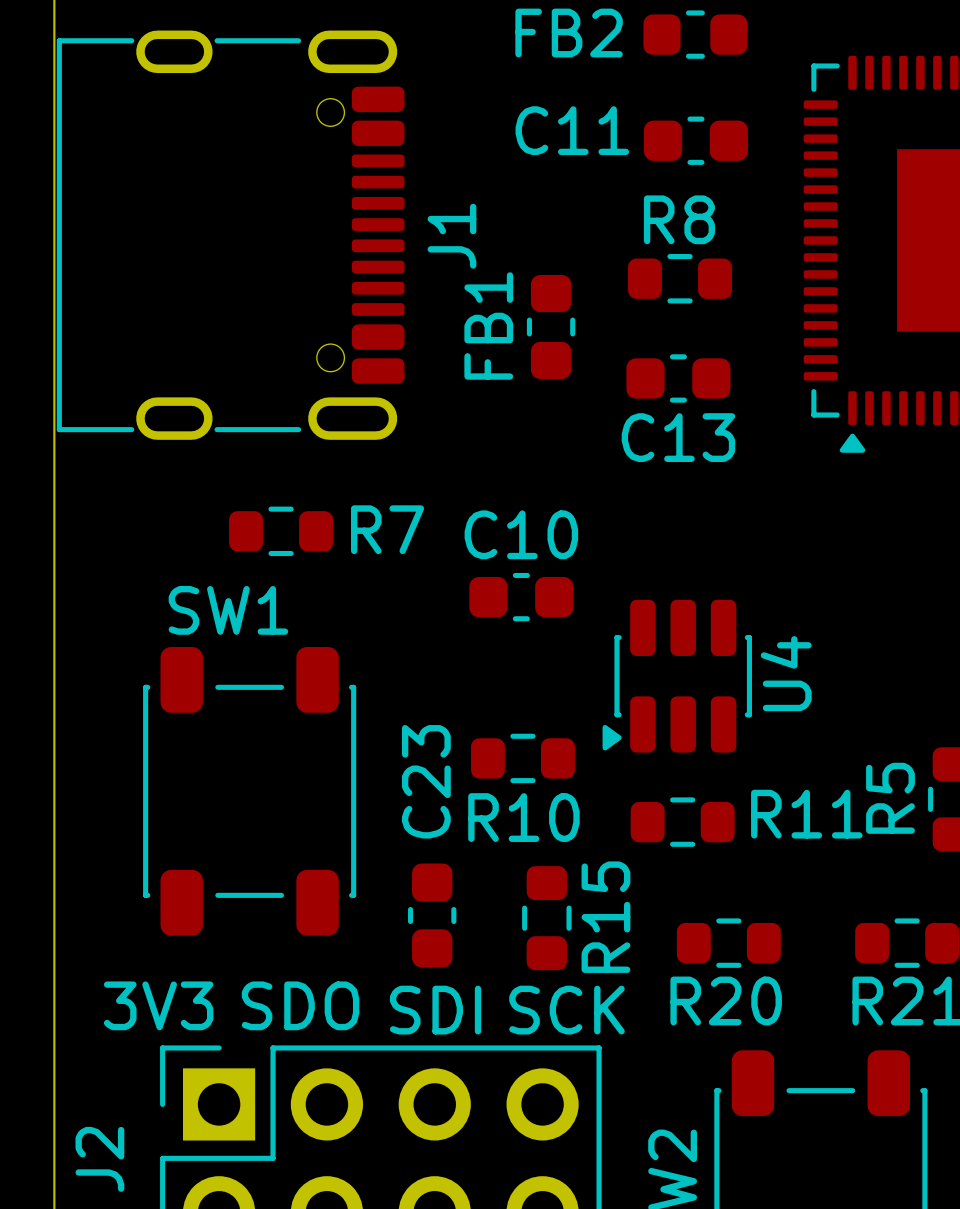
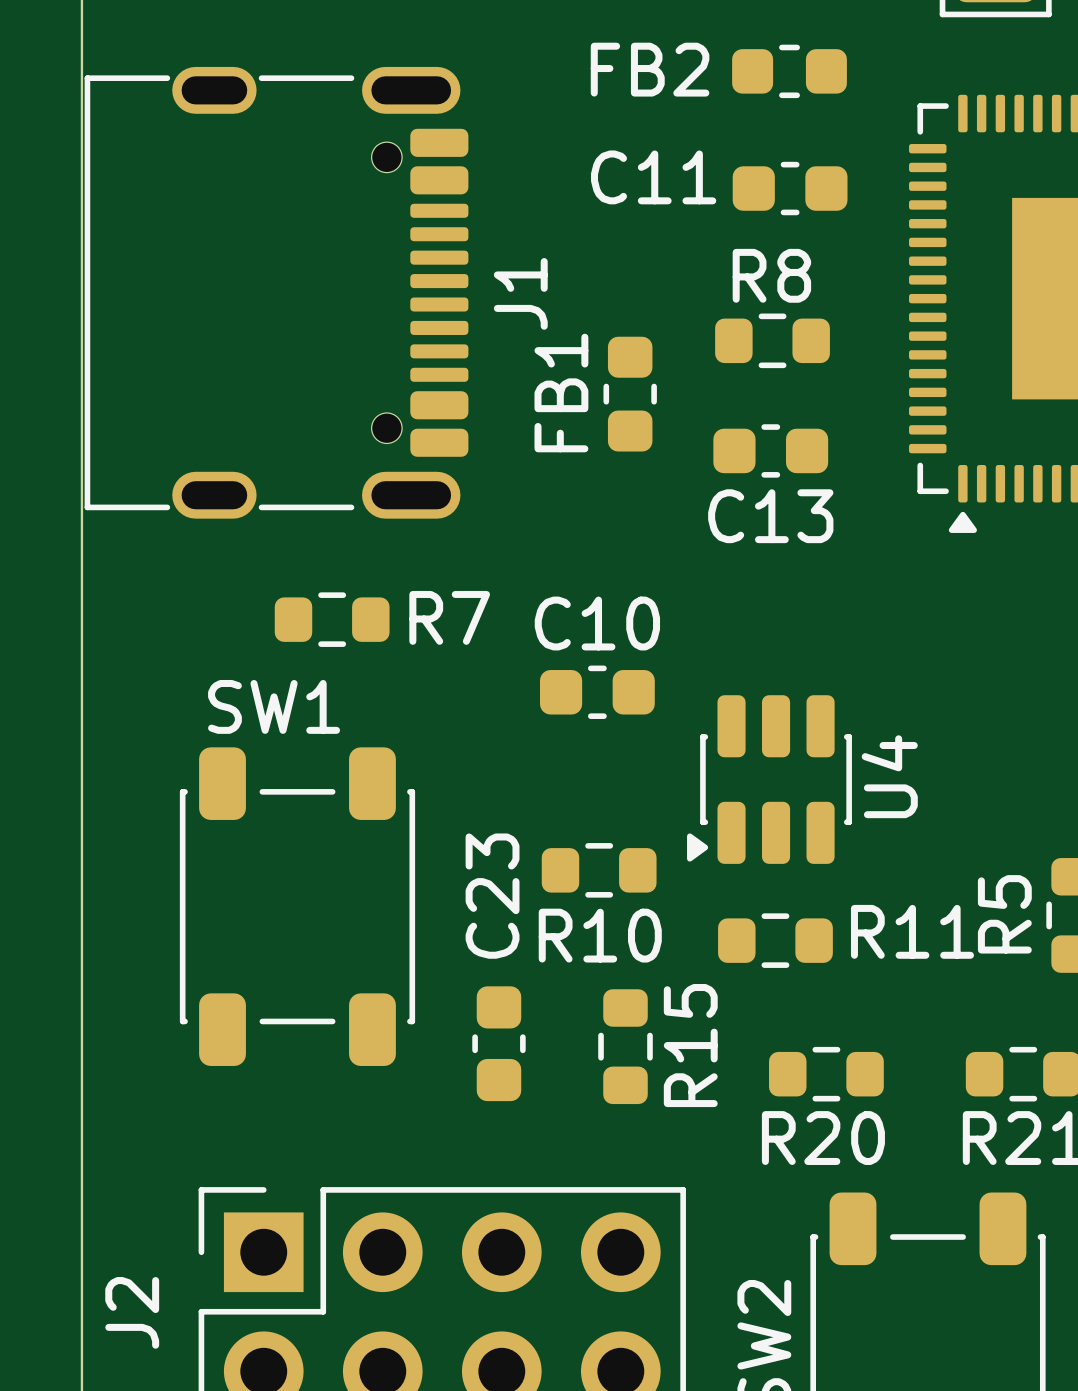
text: 3V3 (158, 1005) -> none
text: SDO (300, 1005) -> none
text: SDI (435, 1010) -> none
text: SCK (566, 1010) -> none

